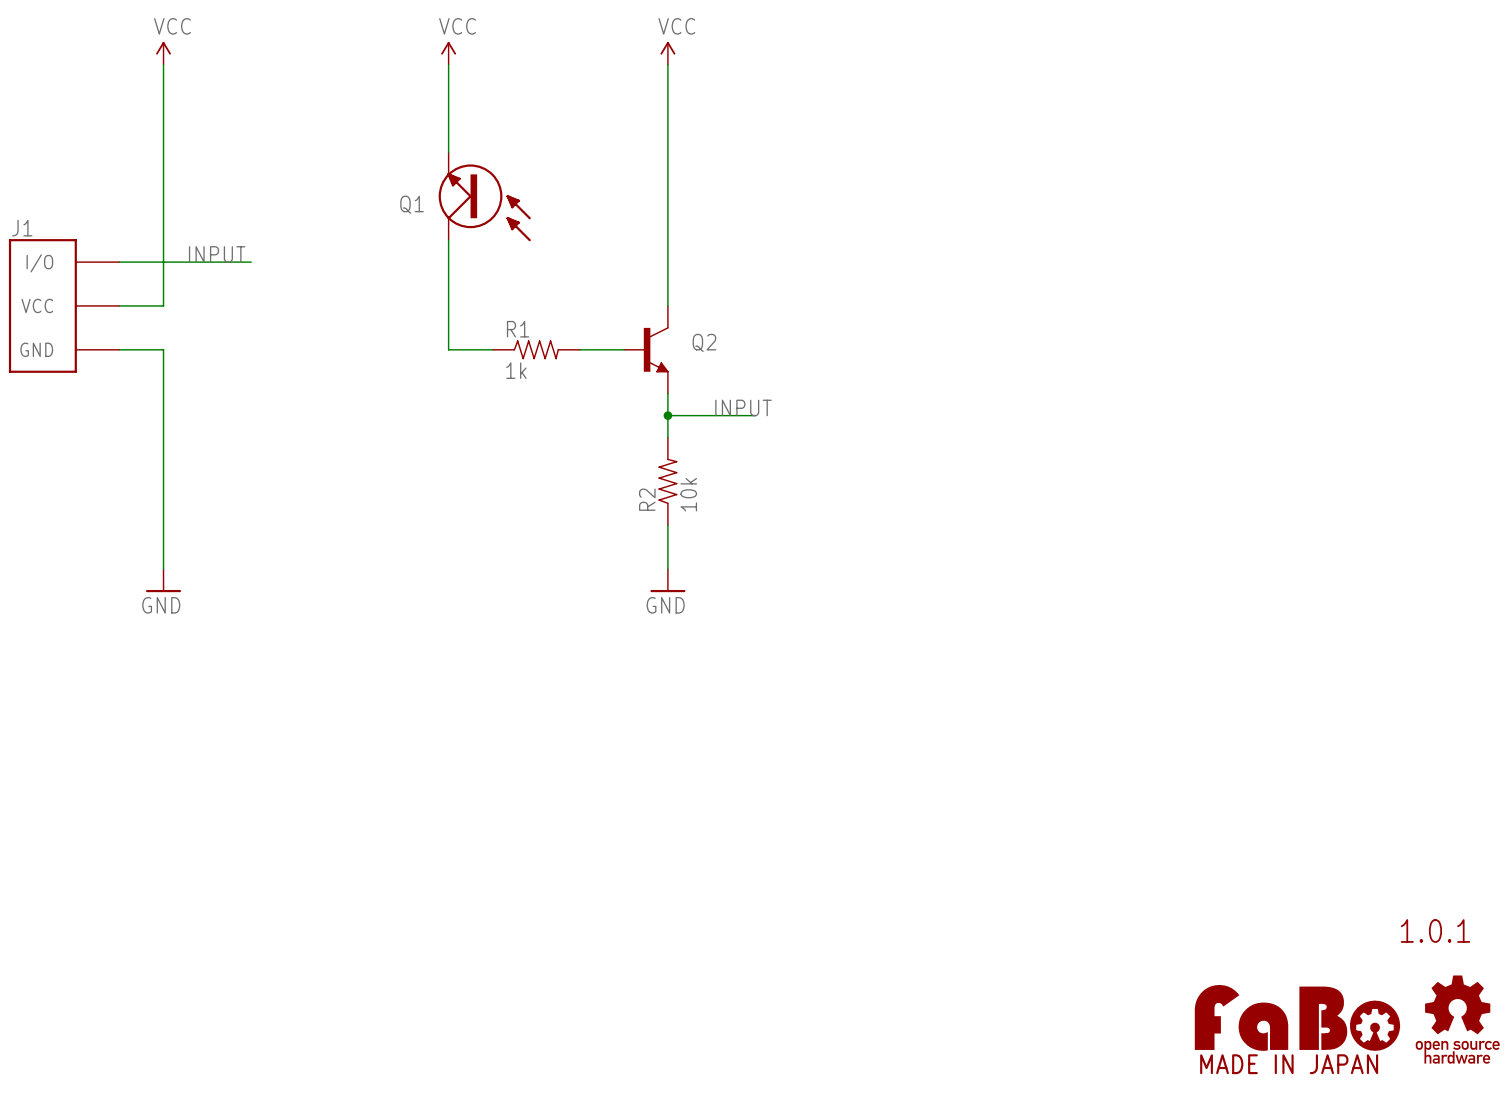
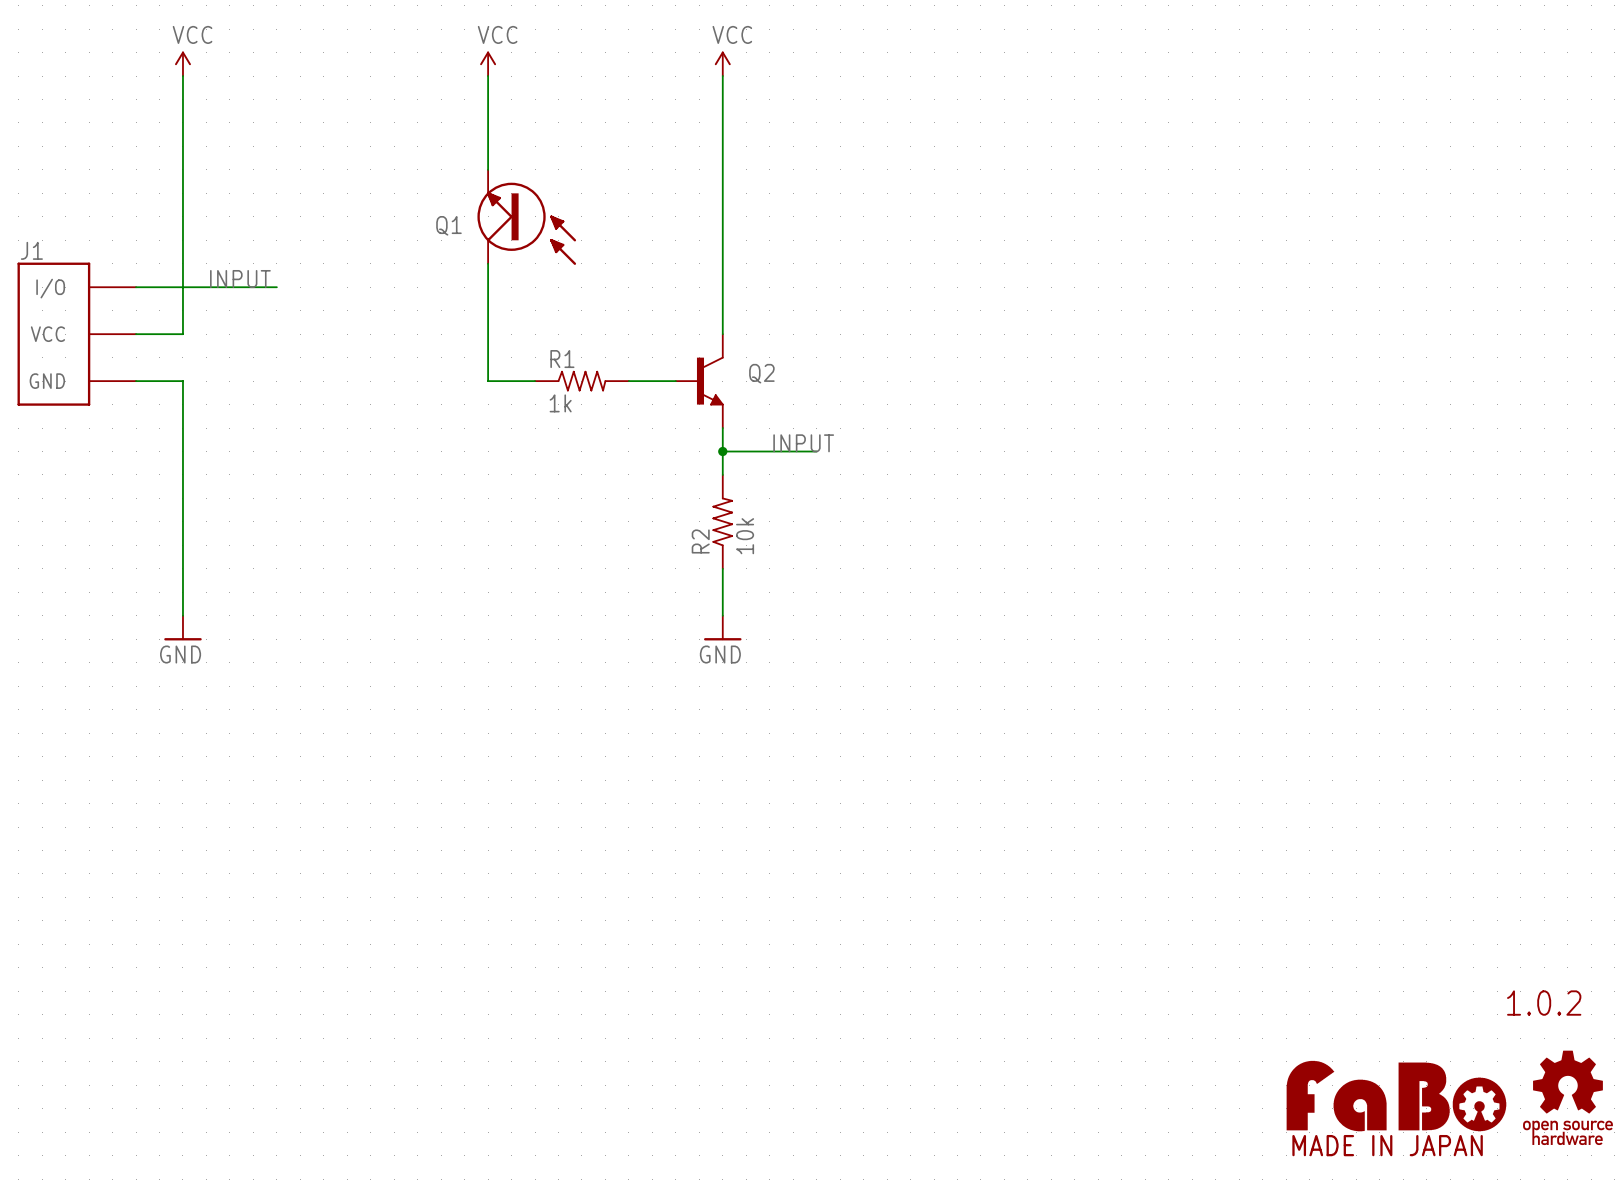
text: 1.0.1 (1435, 930) -> 1.0.2 (1544, 1003)

